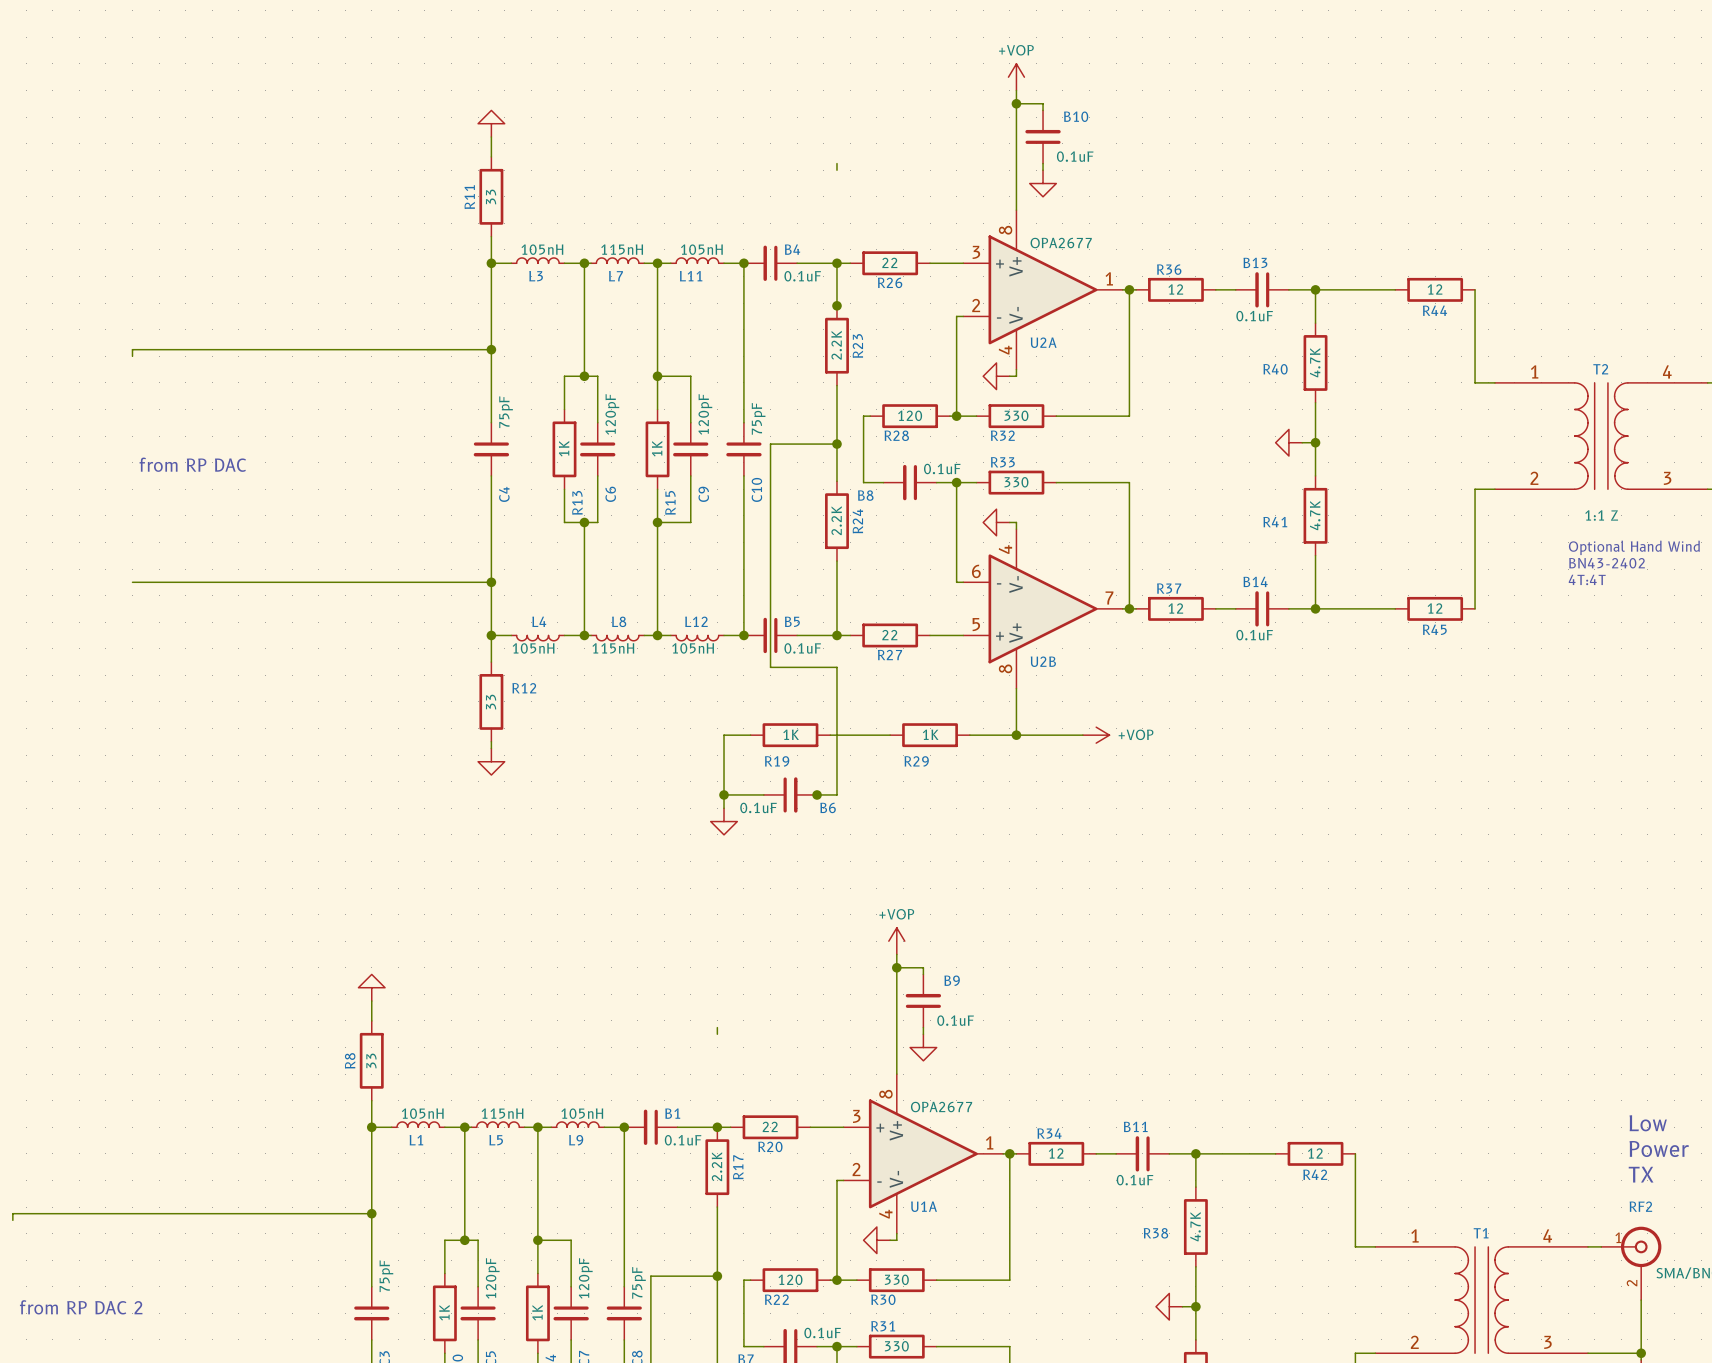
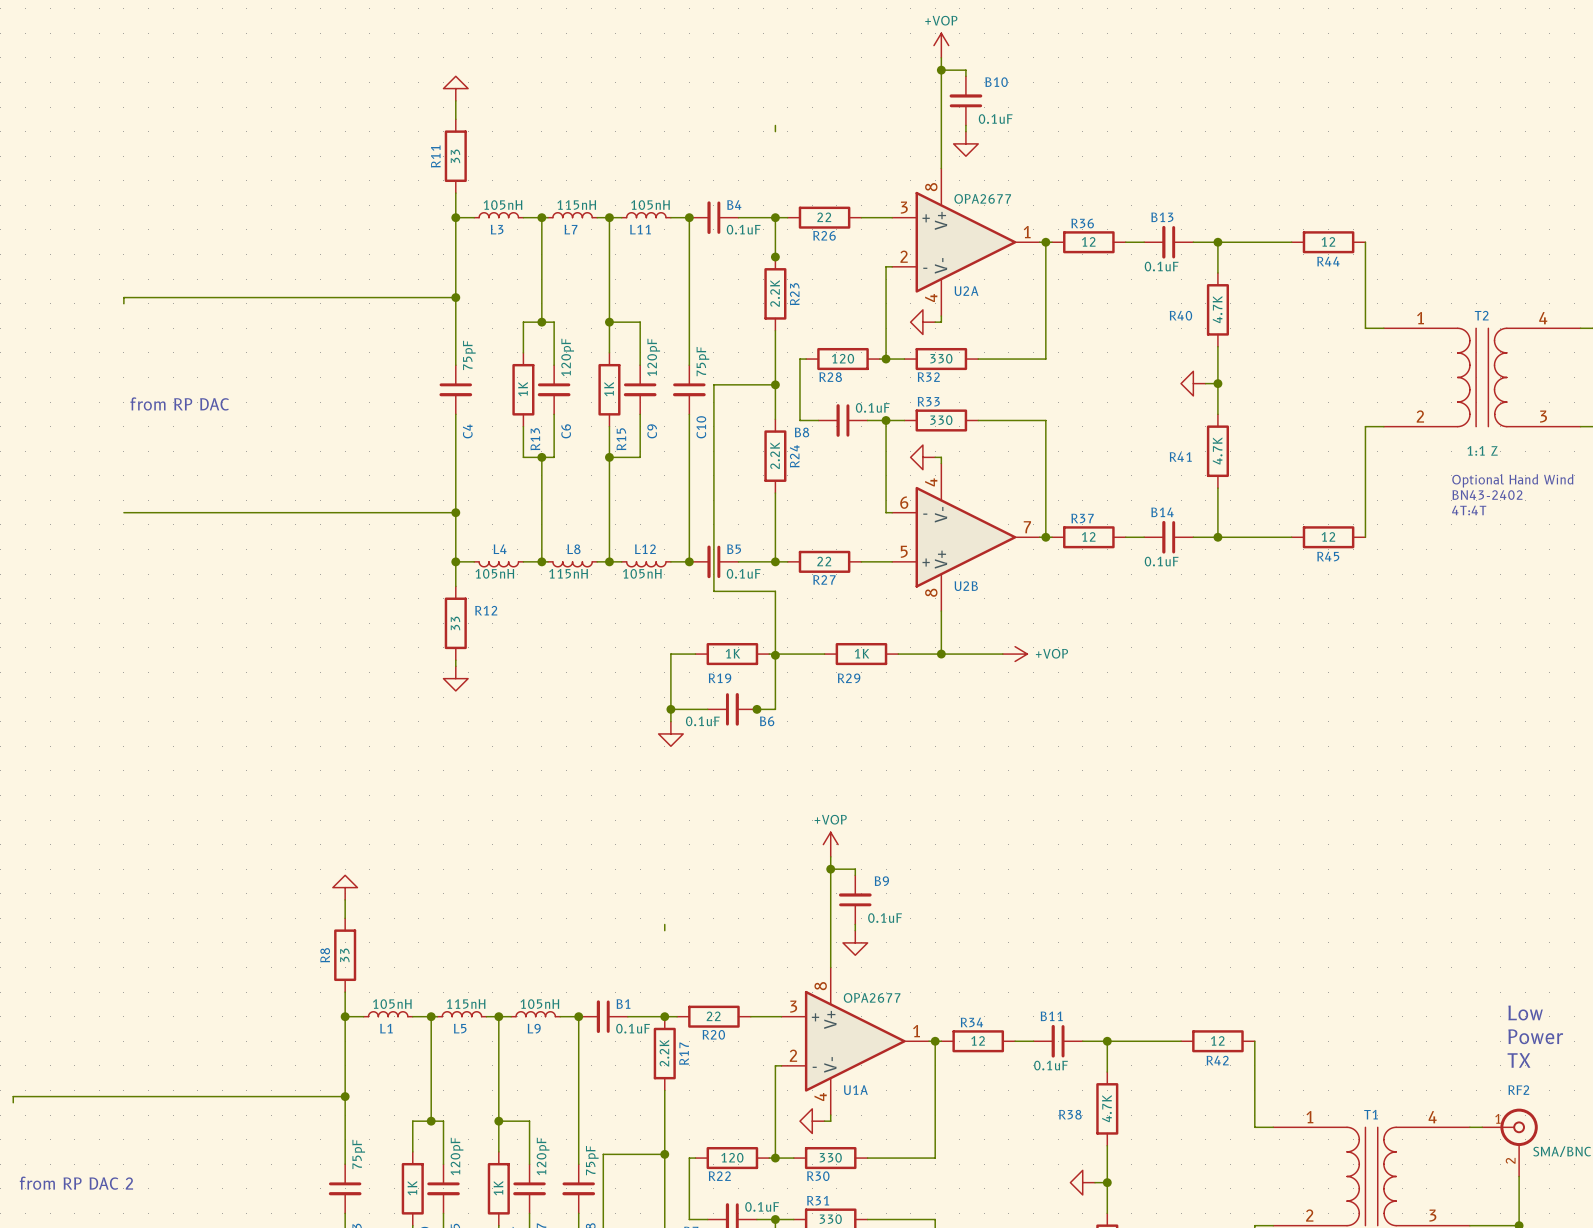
junction: none -> (775, 655)

